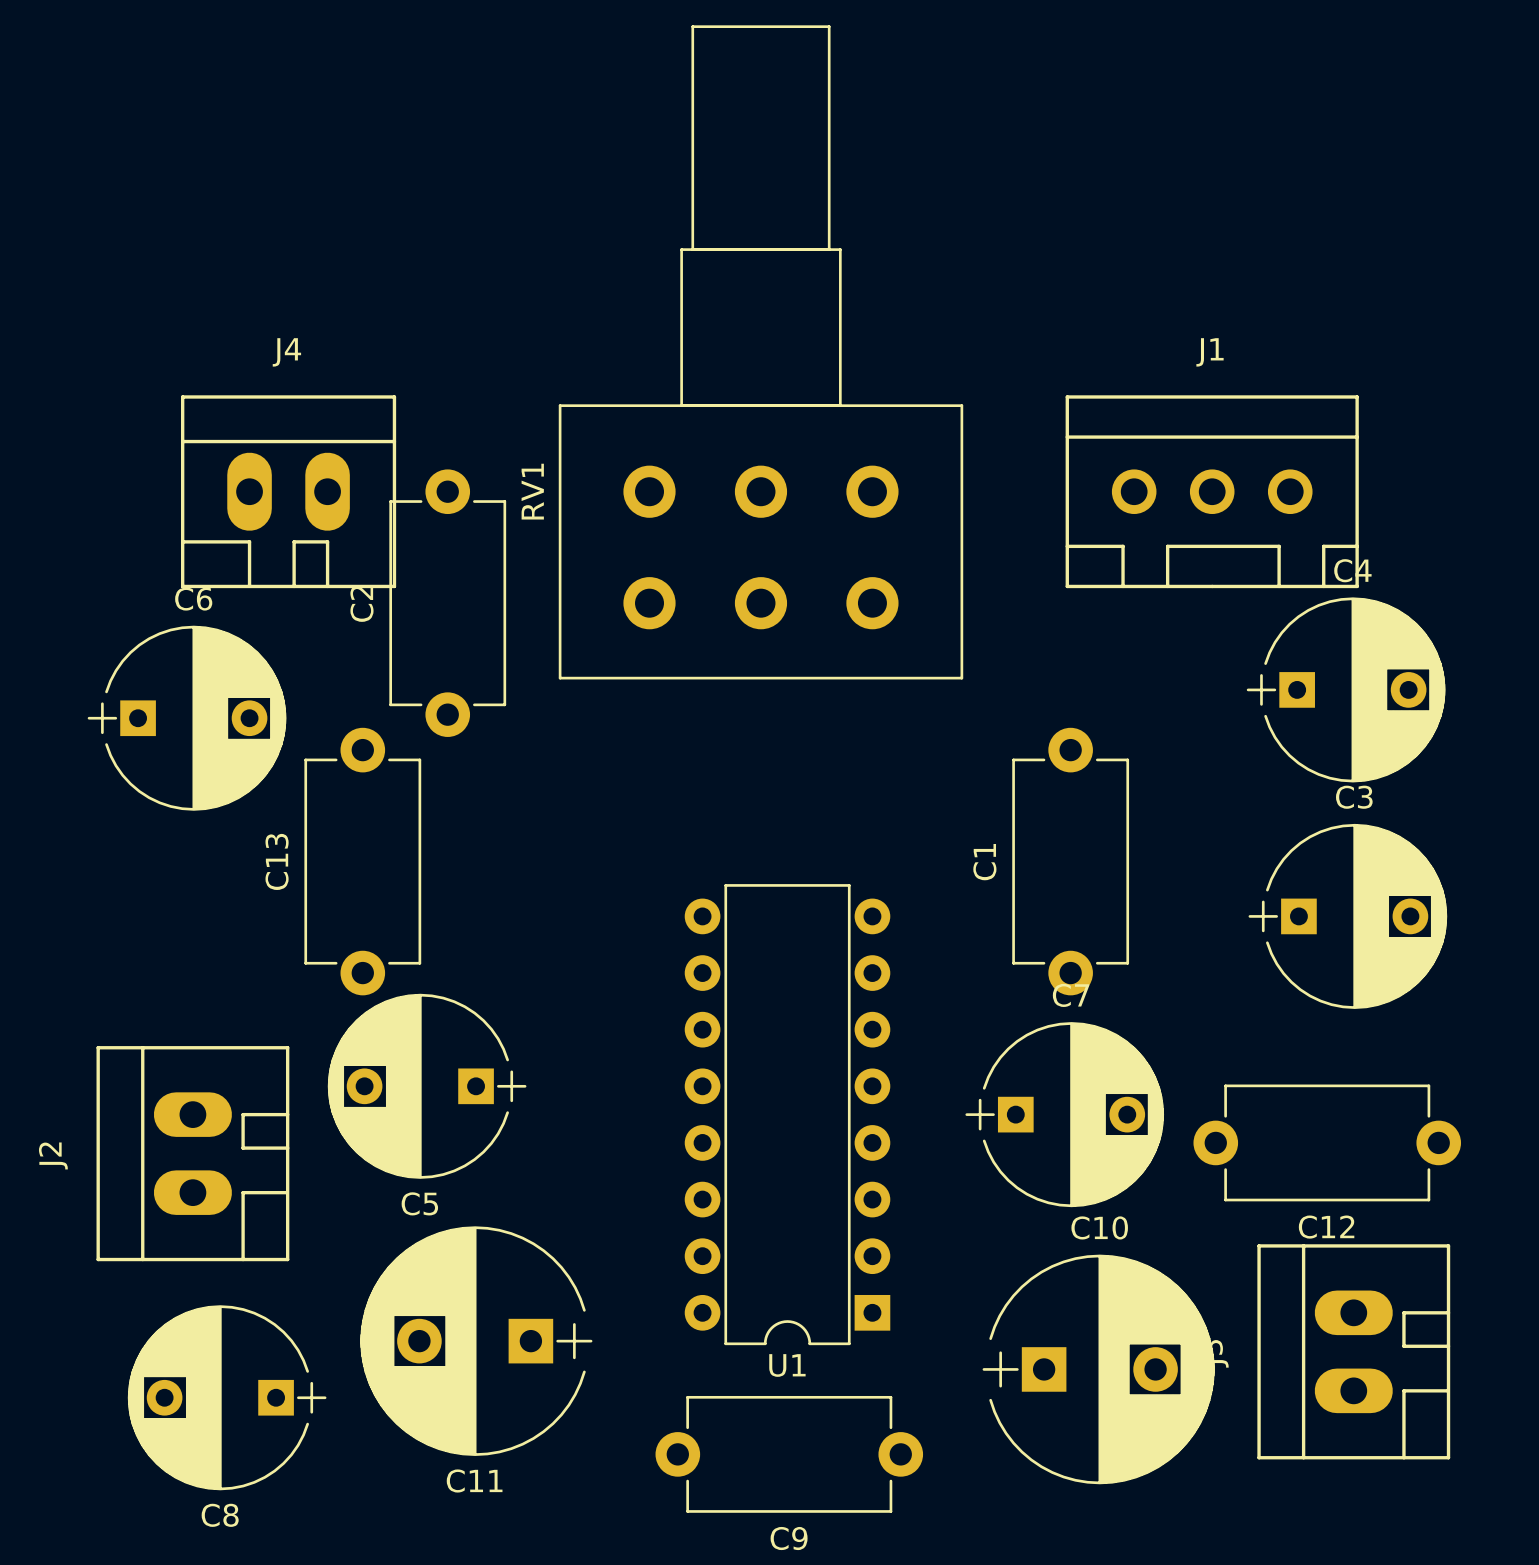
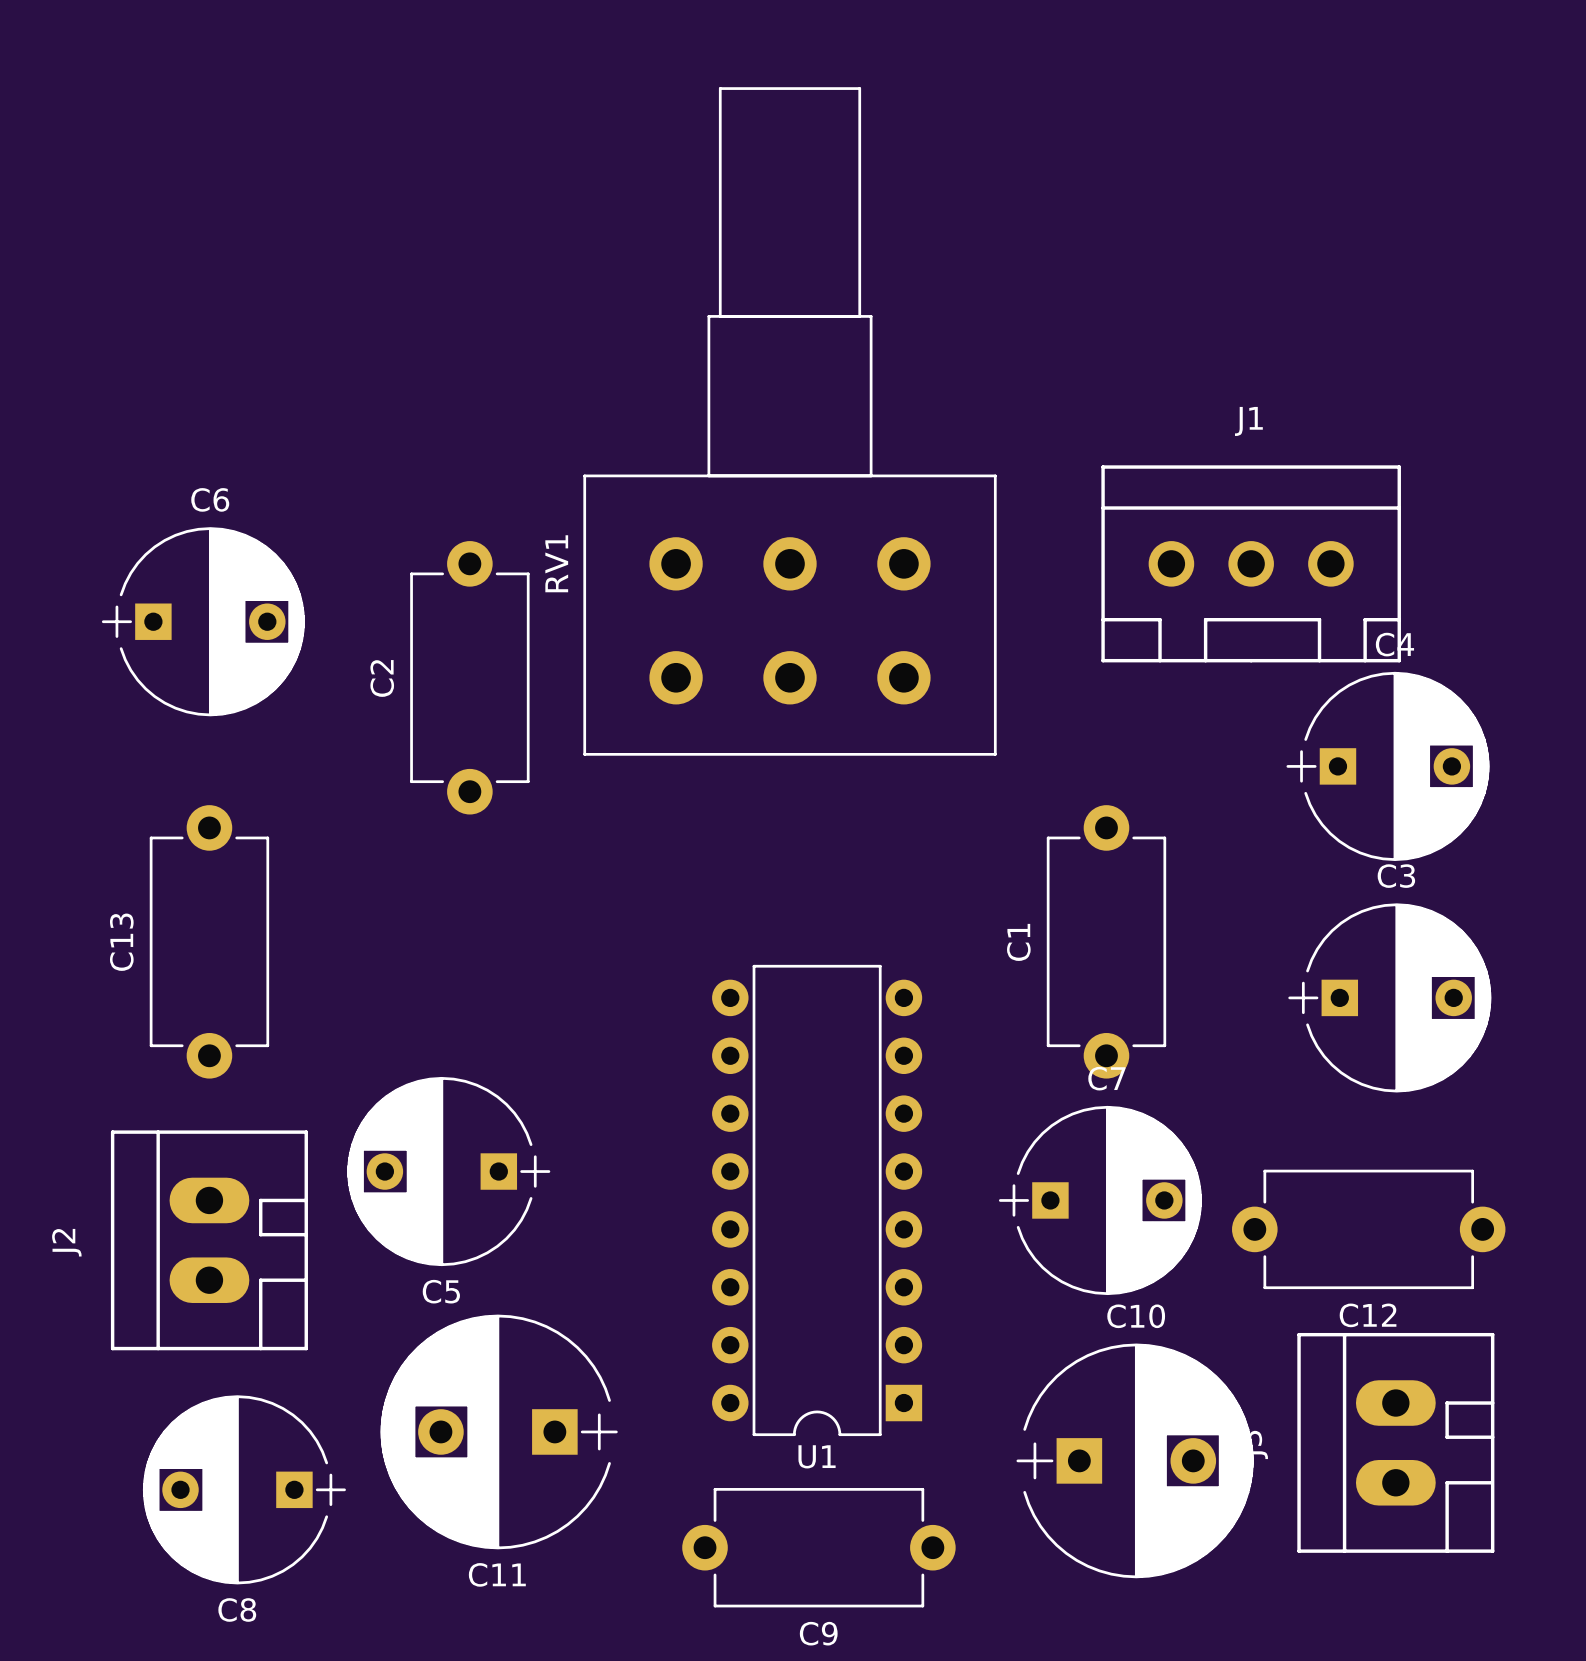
J4: (288, 491) -> none
C6 position: (187, 718) -> (203, 621)
C13 position: (362, 861) -> (209, 941)

